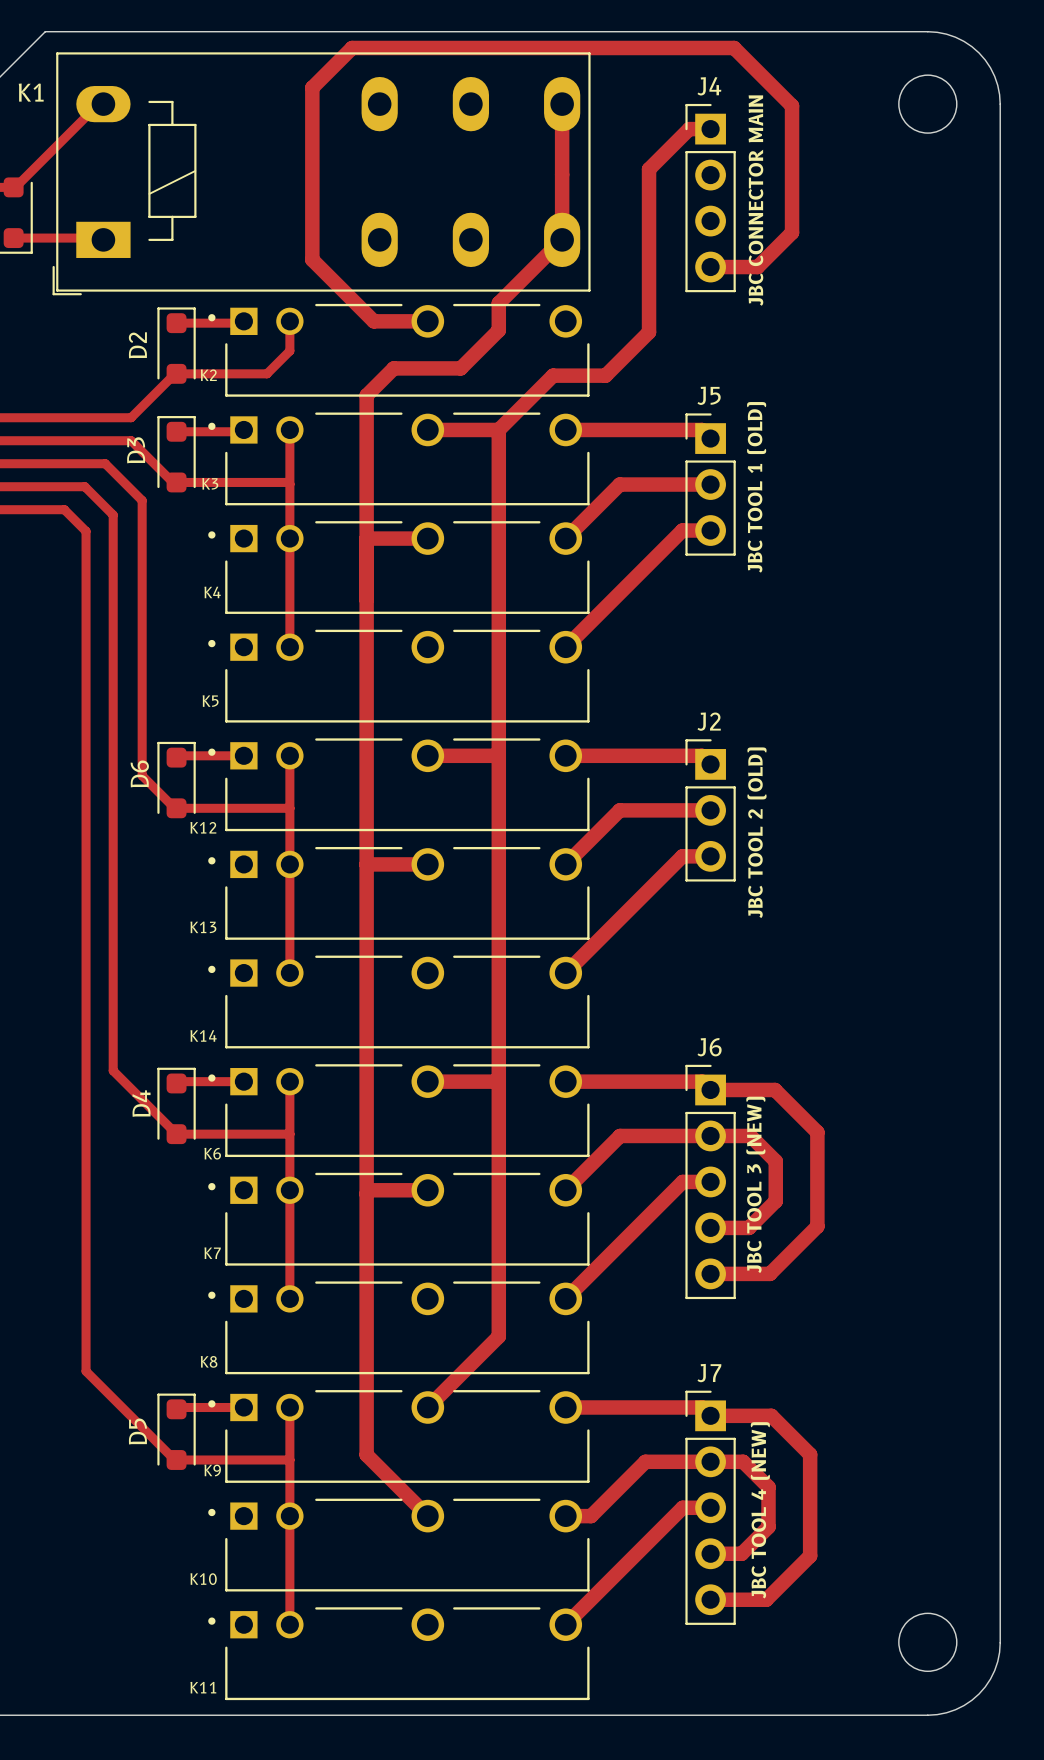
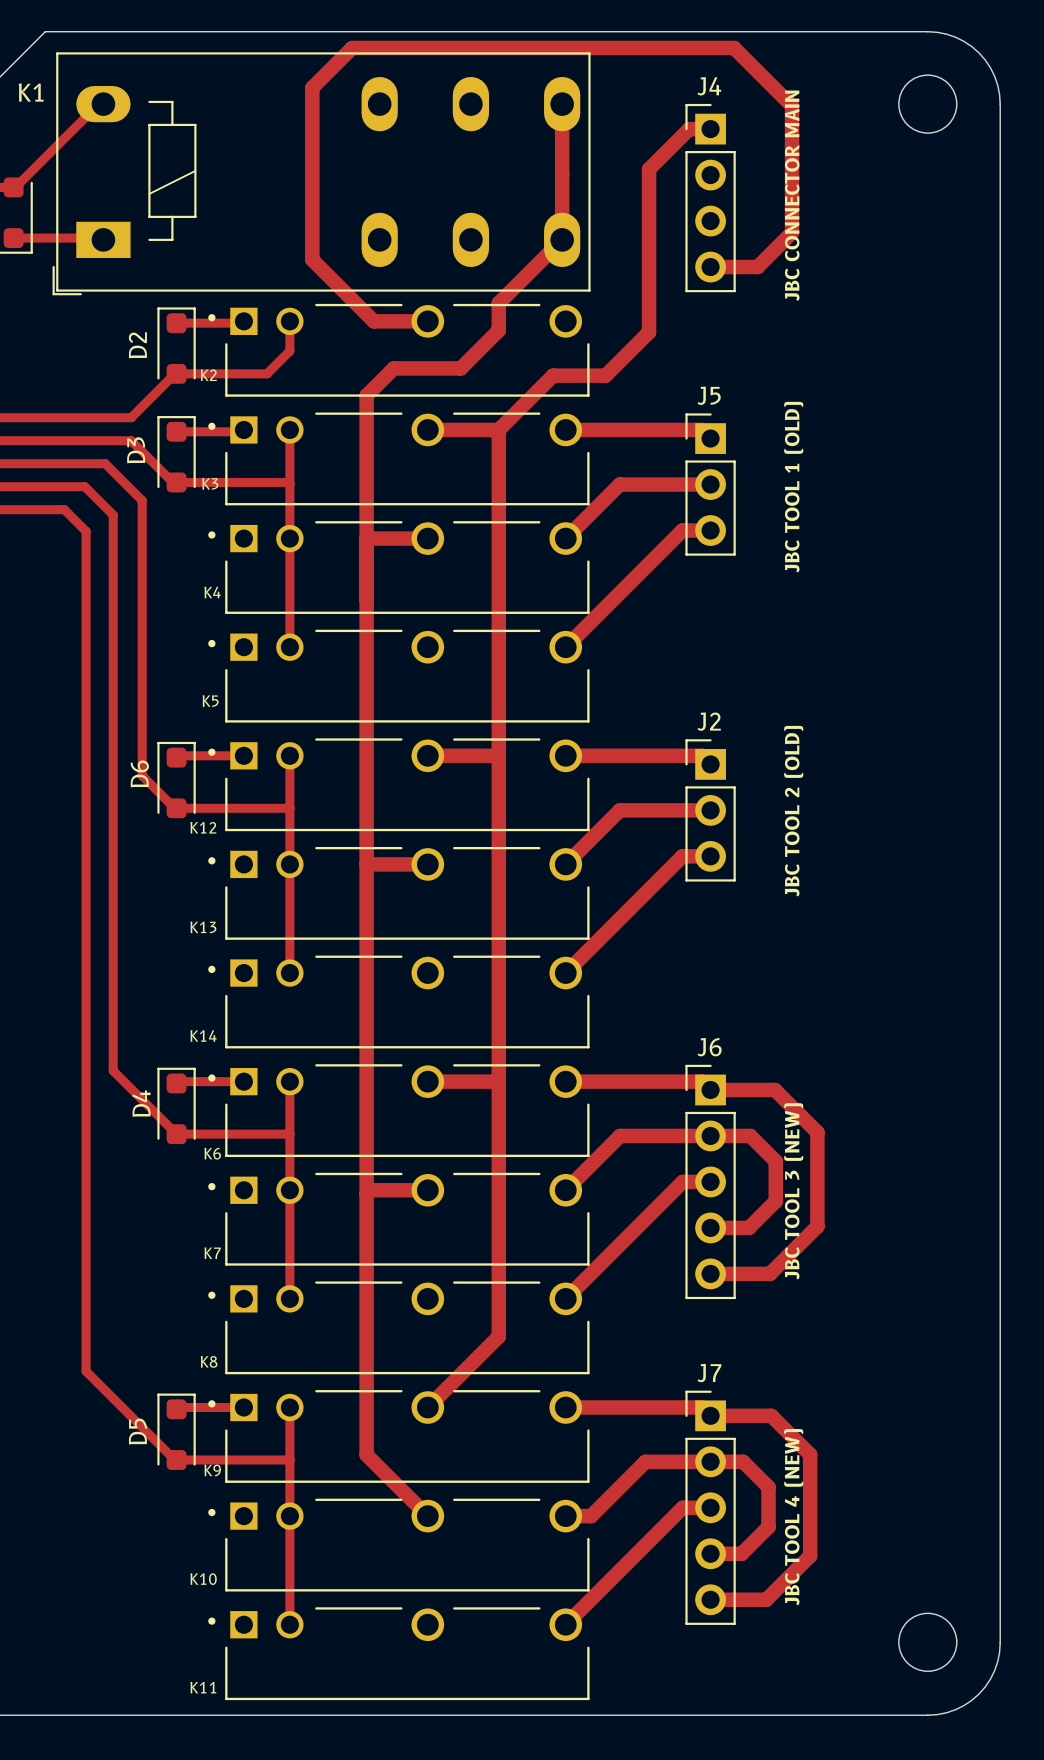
text position: JBC CONNECTOR MAIN (755, 200) -> JBC CONNECTOR MAIN (792, 195)
text position: JBC TOOL 1 (OLD) (756, 487) -> JBC TOOL 1 (OLD) (793, 487)
text position: JBC TOOL 2 (OLD) (756, 832) -> JBC TOOL 2 (OLD) (793, 811)
text position: JBC TOOL 3 (NEW) (755, 1184) -> JBC TOOL 3 (NEW) (793, 1191)
text position: JBC TOOL 4 (NEW) (760, 1510) -> JBC TOOL 4 (NEW) (793, 1517)

